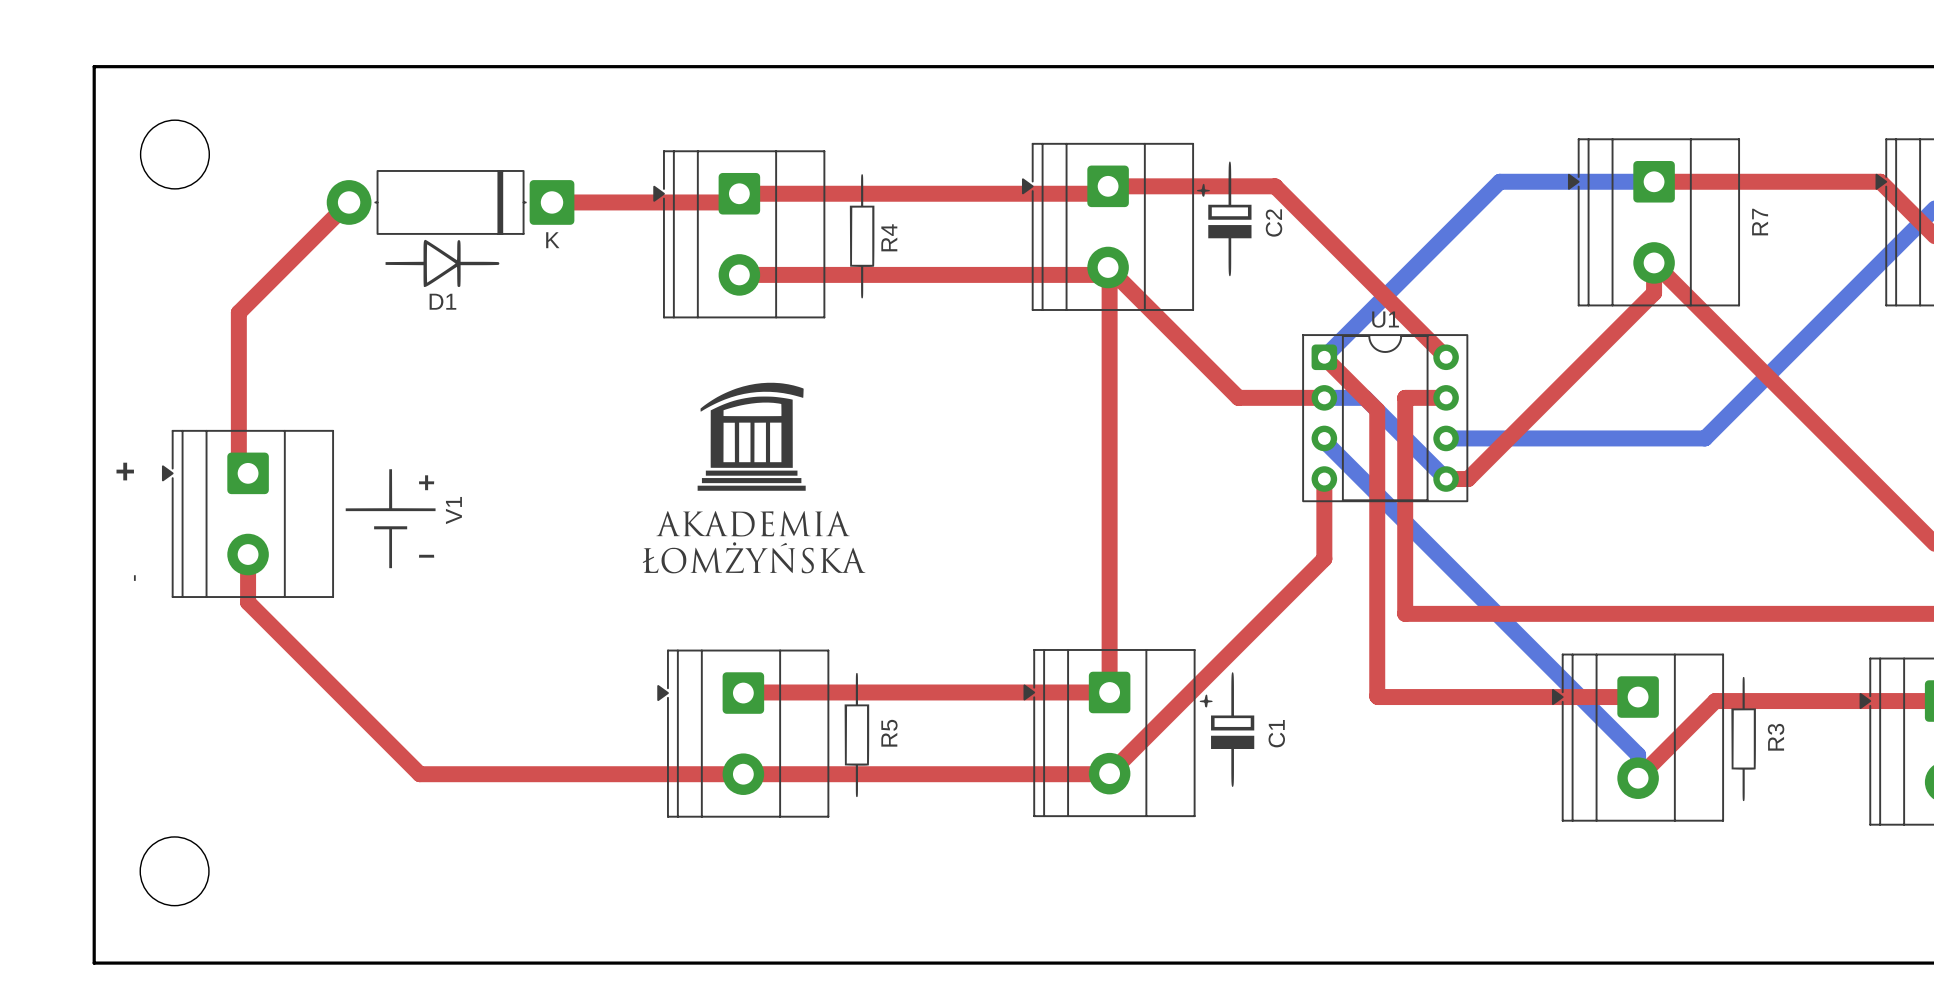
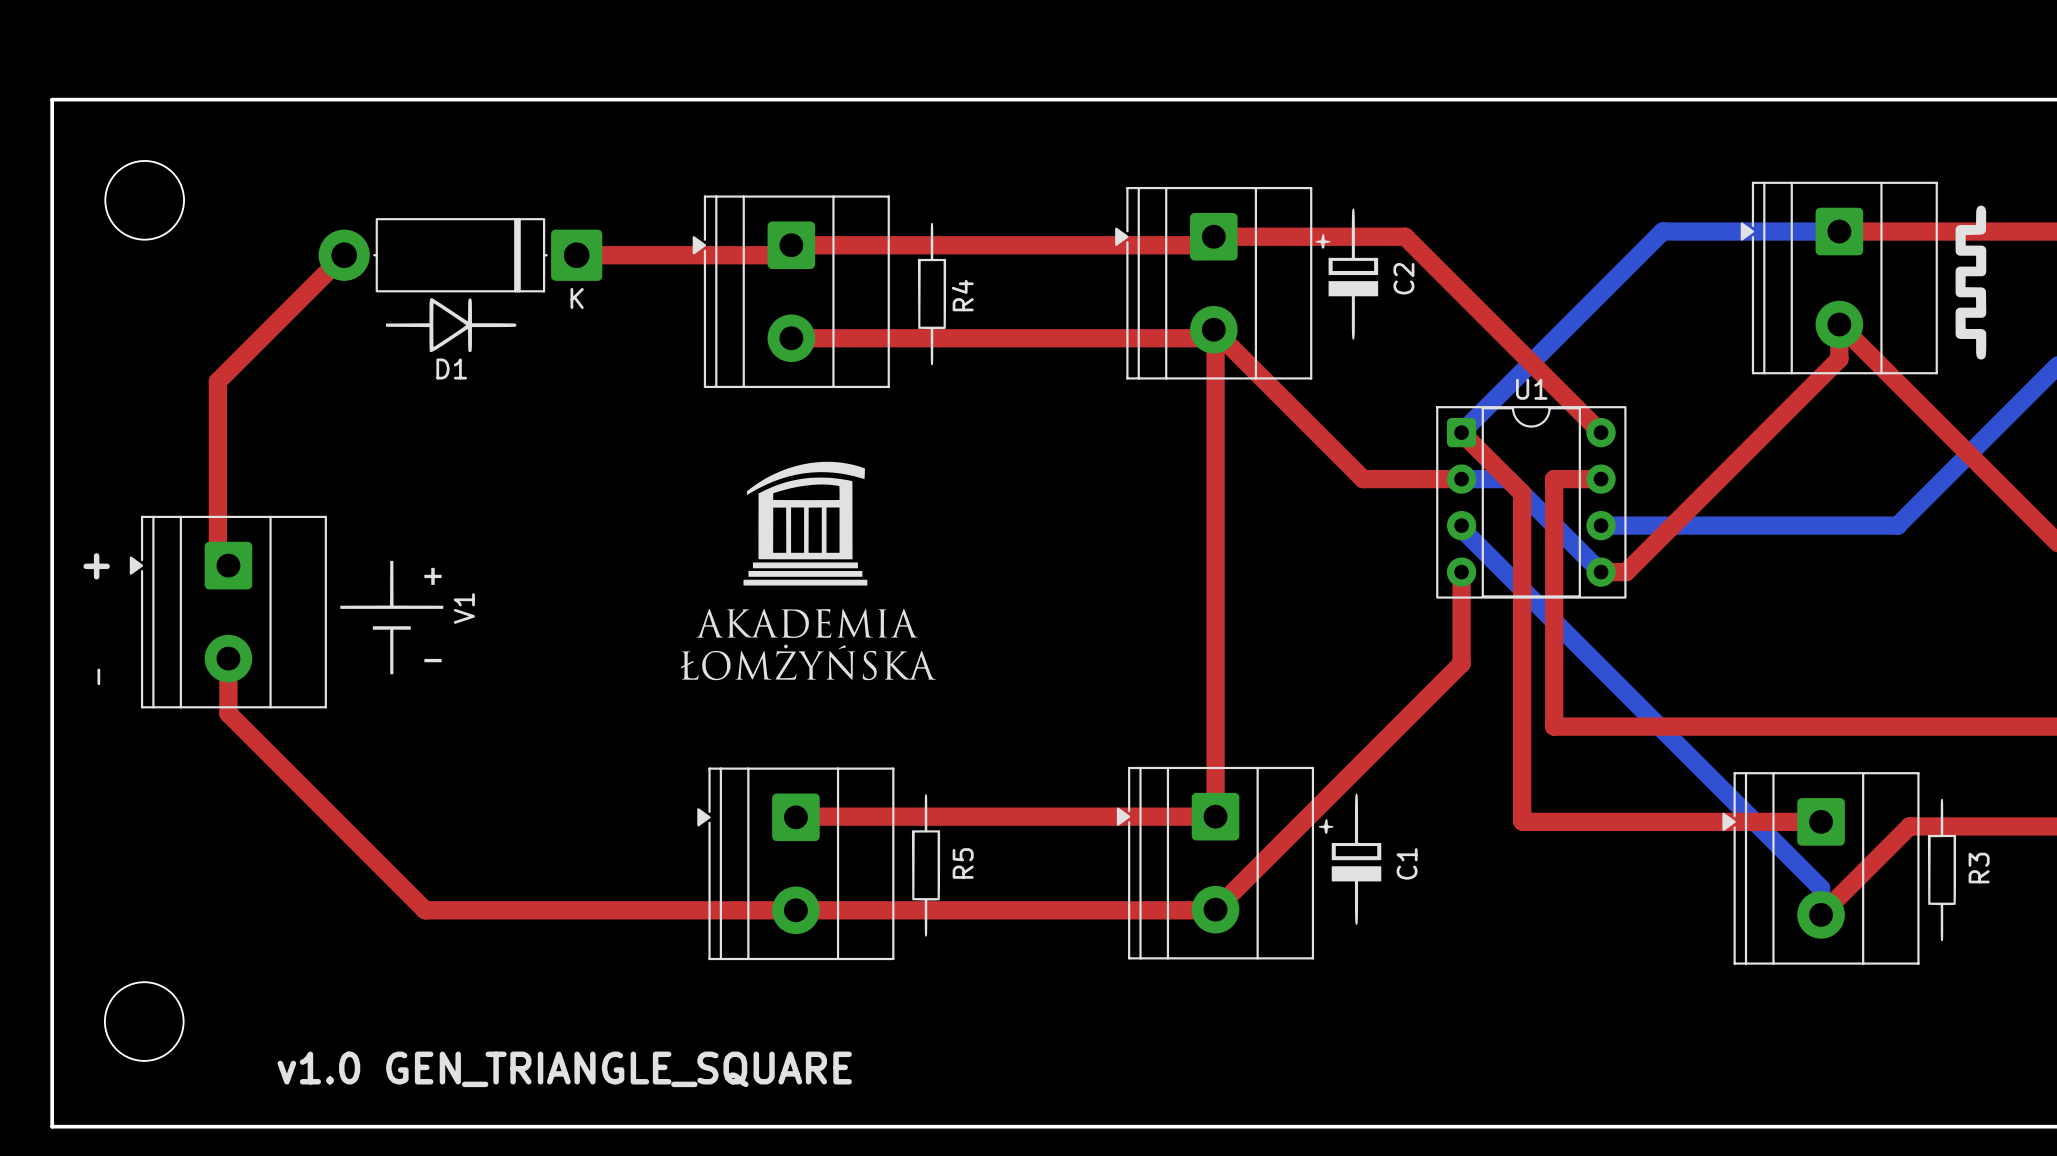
drawing: none -> [1955, 205, 1987, 360]
R7 name: R7 (1760, 222) -> none
text: none -> v1.0 GEN_TRIANGLE_SQUARE (564, 1069)

